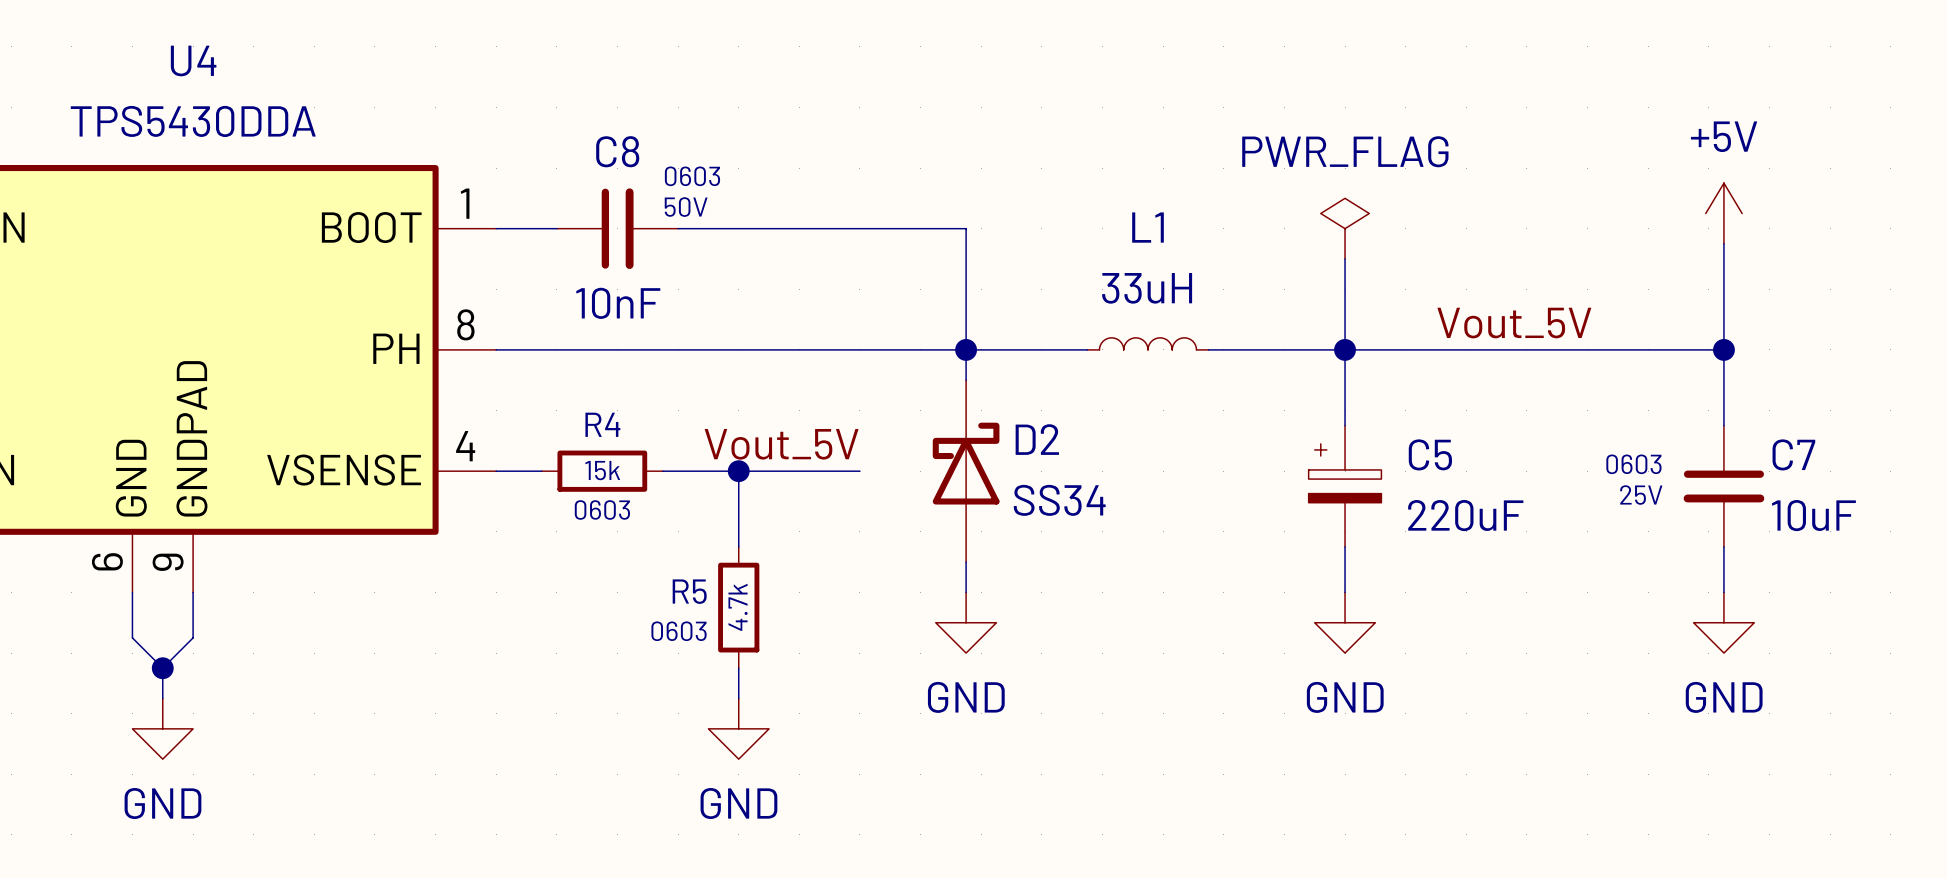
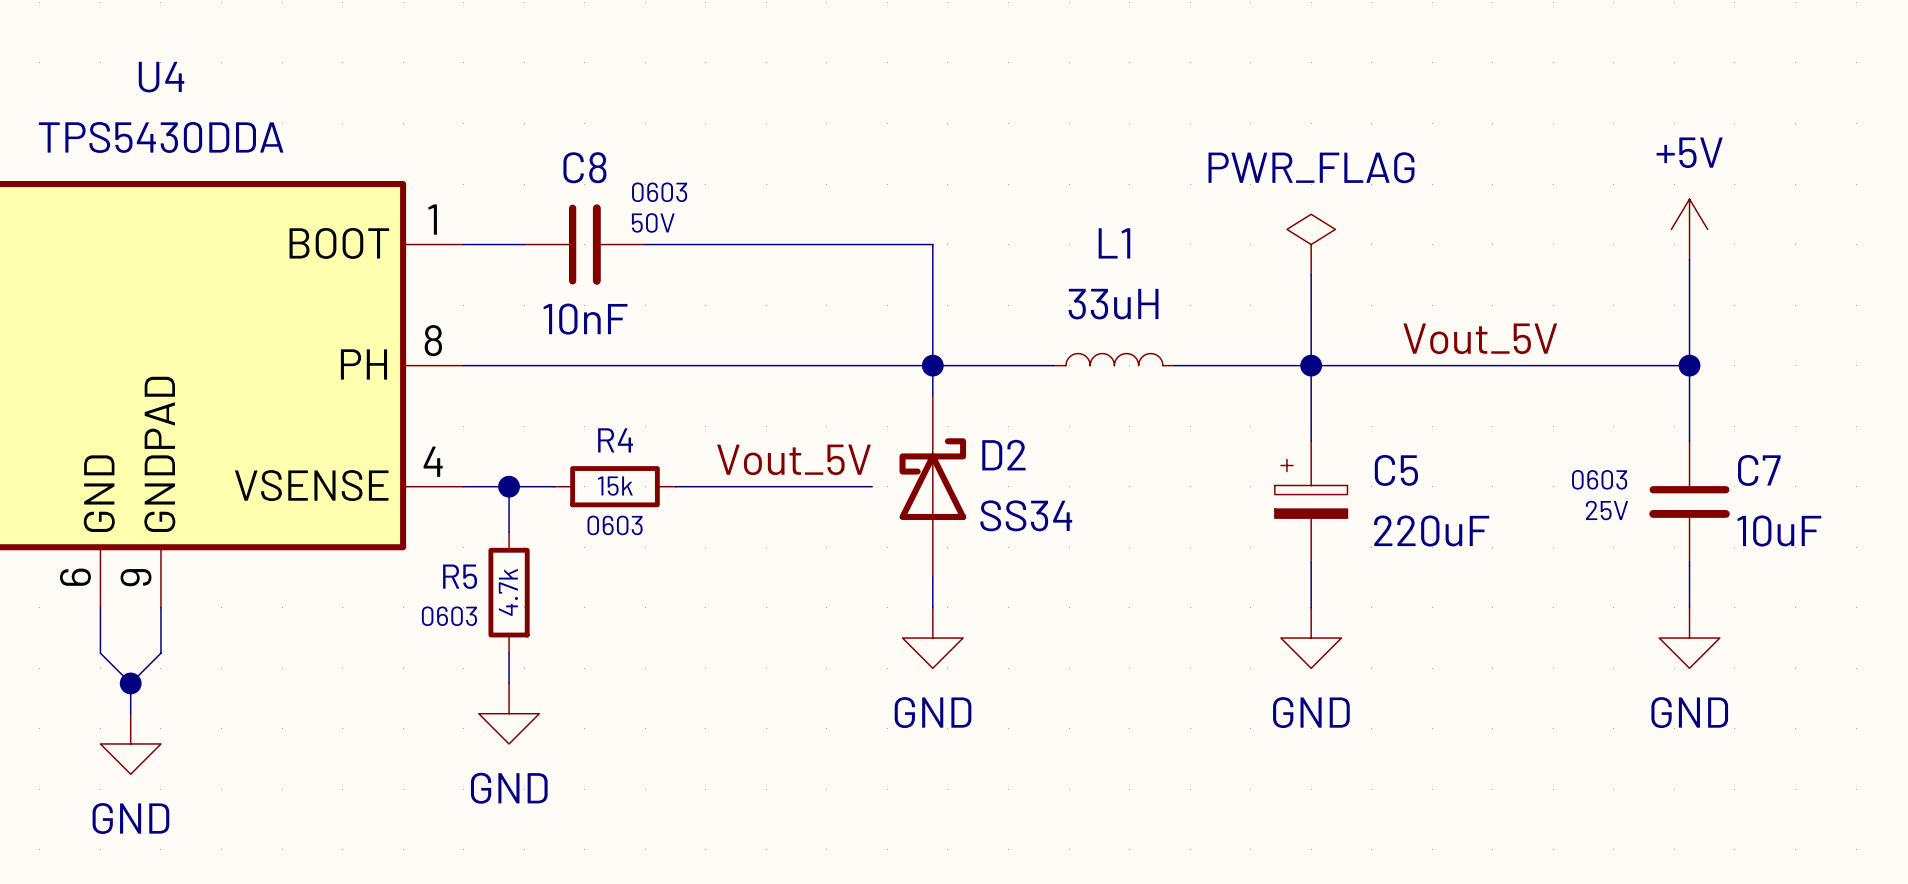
label position: Vout_5V (781, 444) -> Vout_5V (794, 459)
junction: none -> (509, 486)
wire: none -> (554, 486) (509, 486) (509, 532)
R4 position: (602, 471) -> (614, 486)
wire: (662, 471) (708, 471) -> (826, 486) (872, 486)
wire: (738, 471) (738, 546) -> none
junction: (738, 471) -> none
text position: 0603 (602, 509) -> 0603 (615, 525)
text: none -> 0603 (449, 616)
R5 position: (738, 607) -> (509, 592)
text: 0603 (679, 631) -> none
wire: (738, 668) (738, 698) -> (509, 653) (509, 683)
power symbol position: GND (738, 728) -> GND (509, 713)

